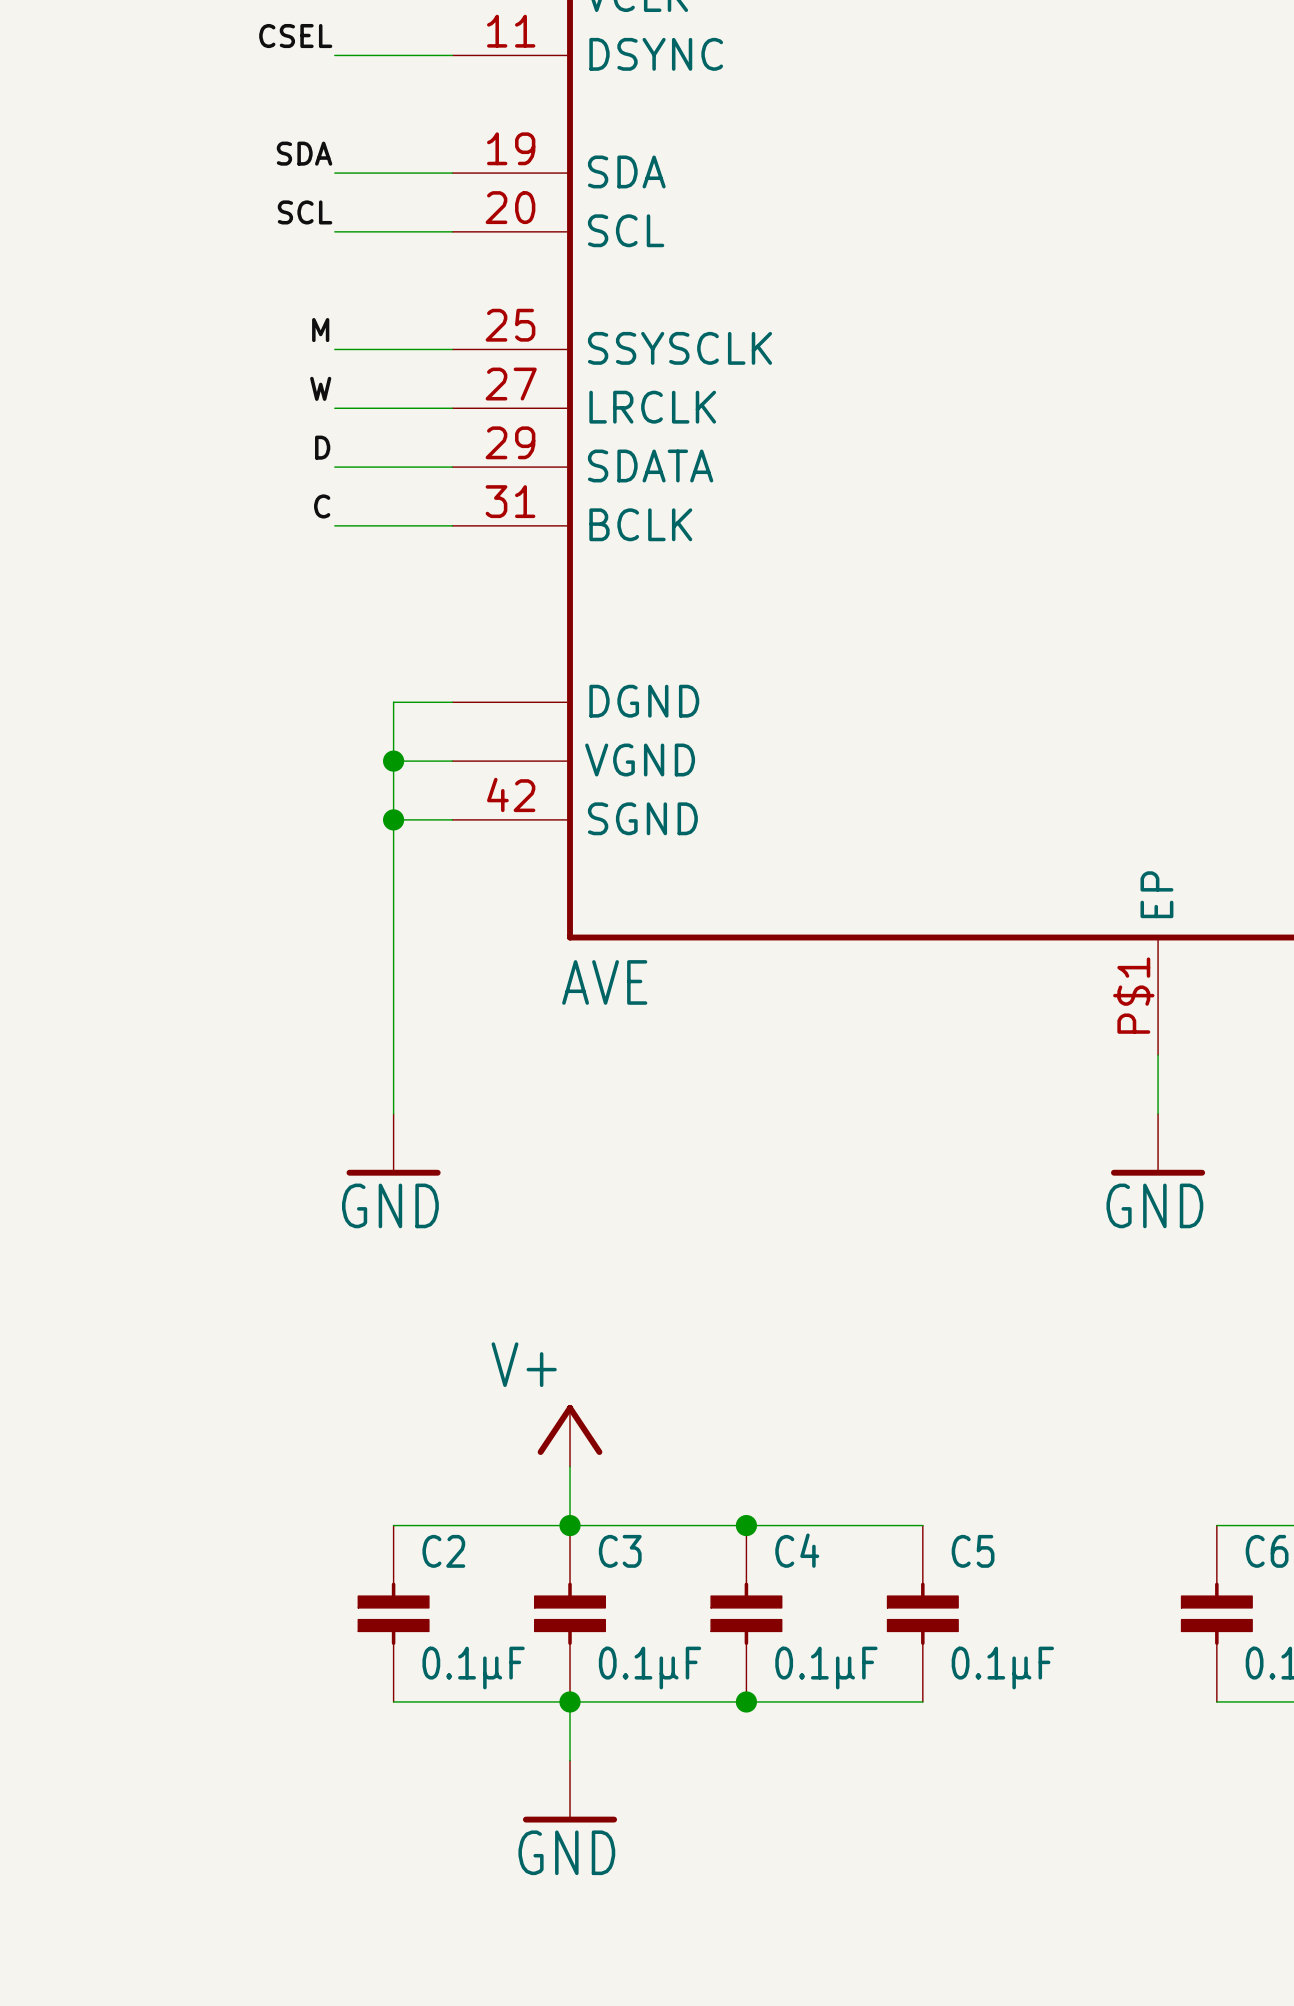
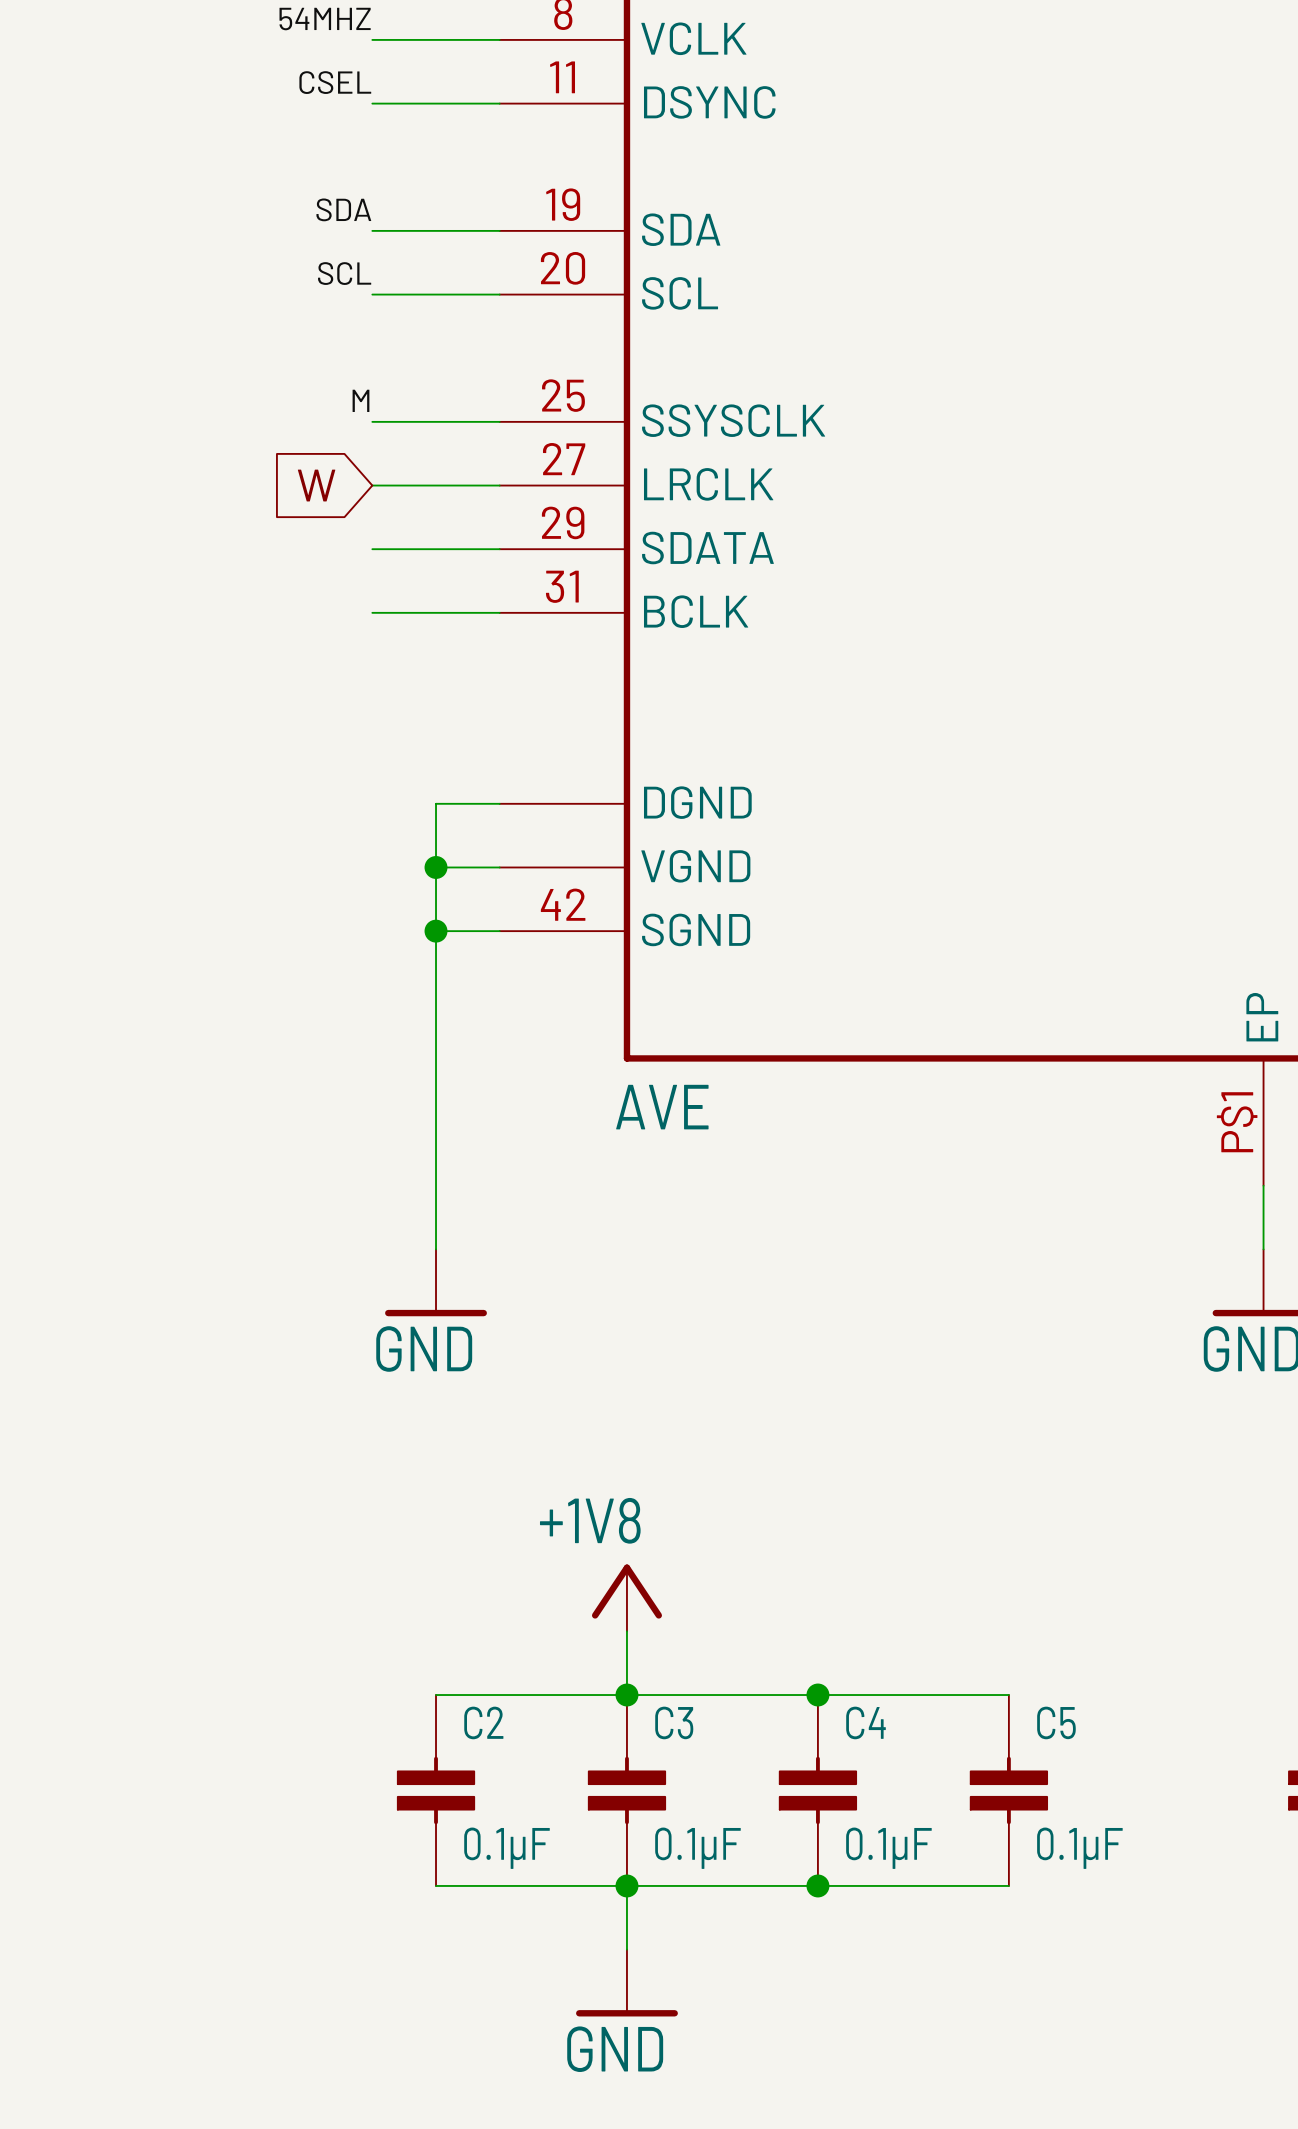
label: W (320, 388) -> none
global label: none -> W (316, 485)
label: D (322, 447) -> none
label: C (322, 506) -> none
power symbol: V+ (570, 1435) -> +1V8 (626, 1597)

